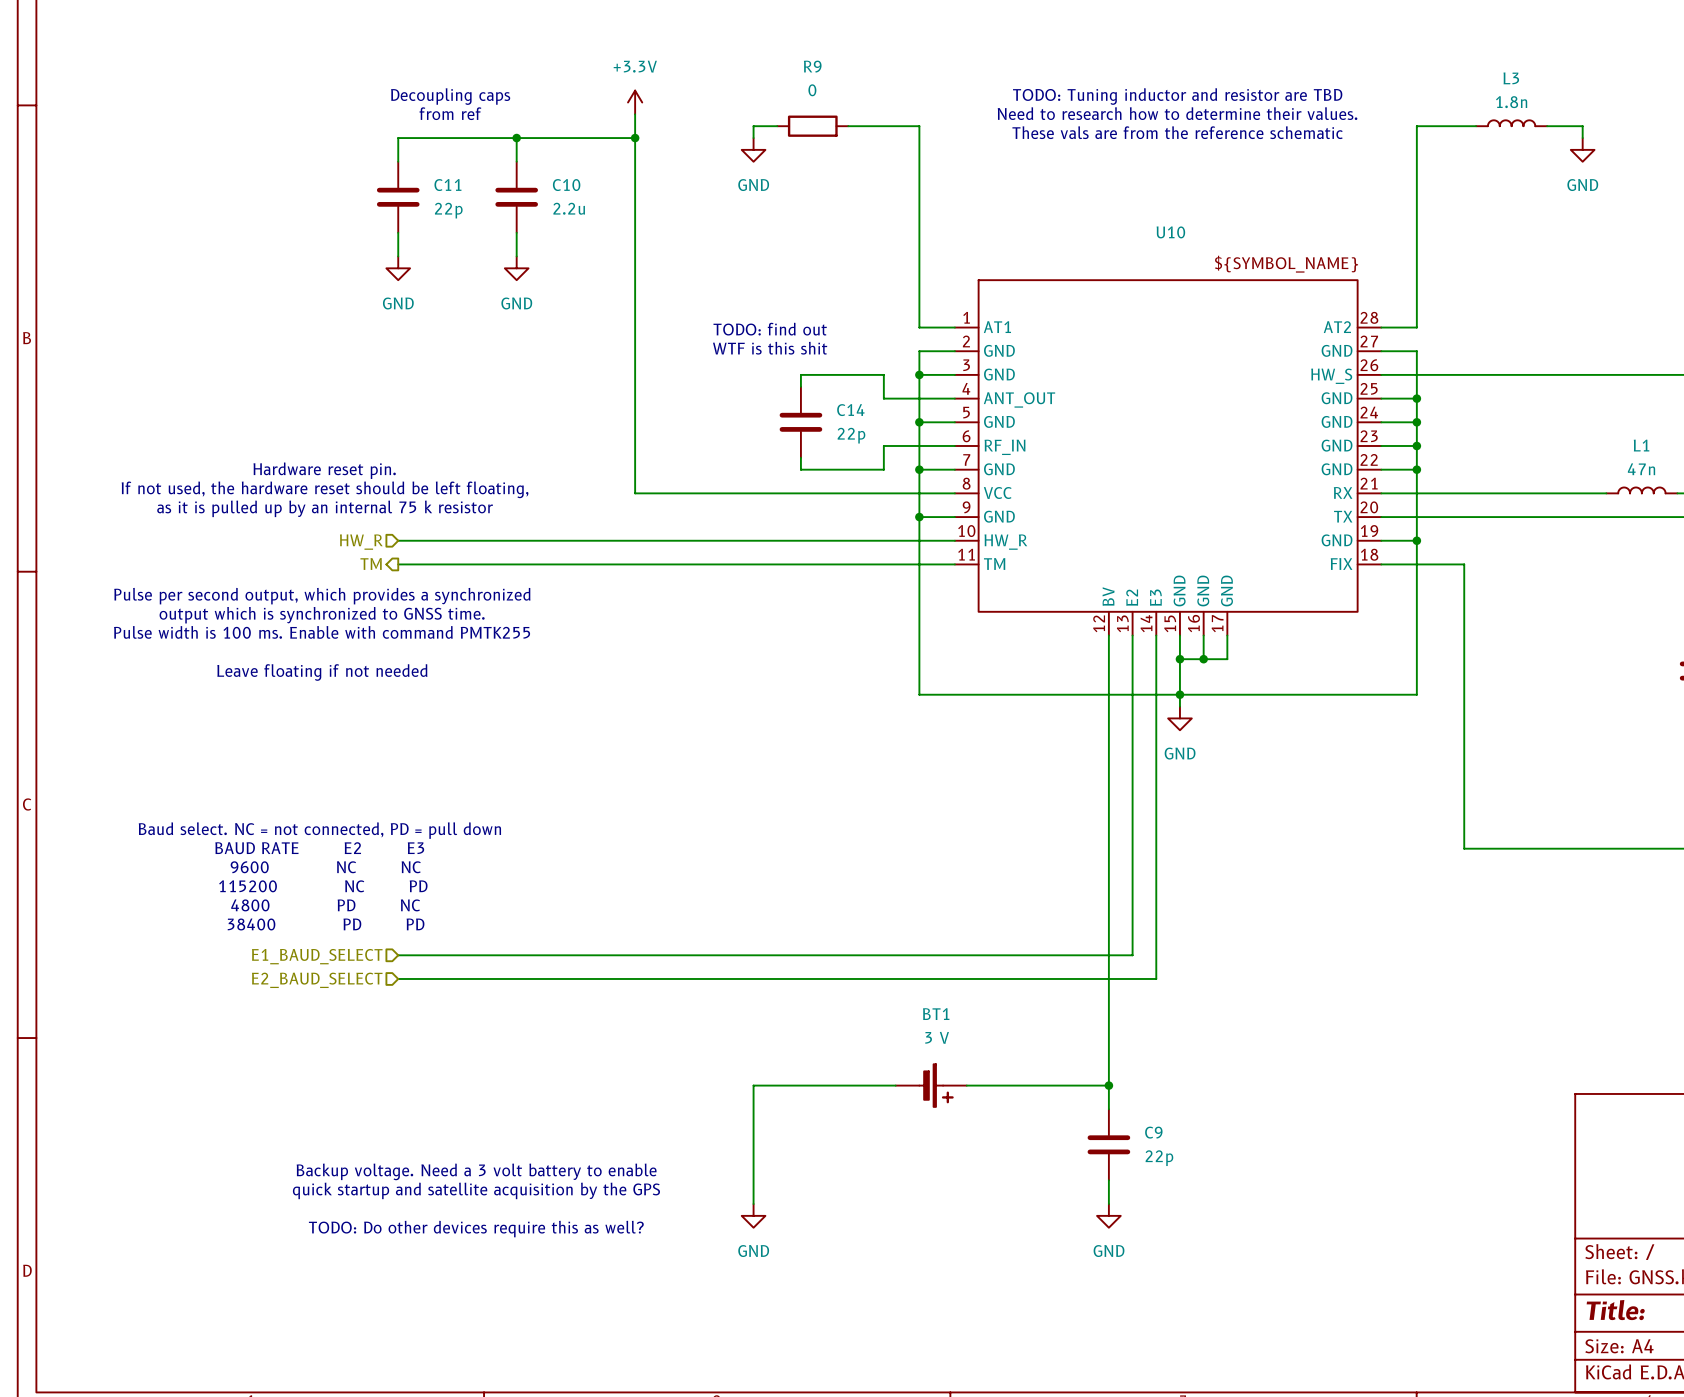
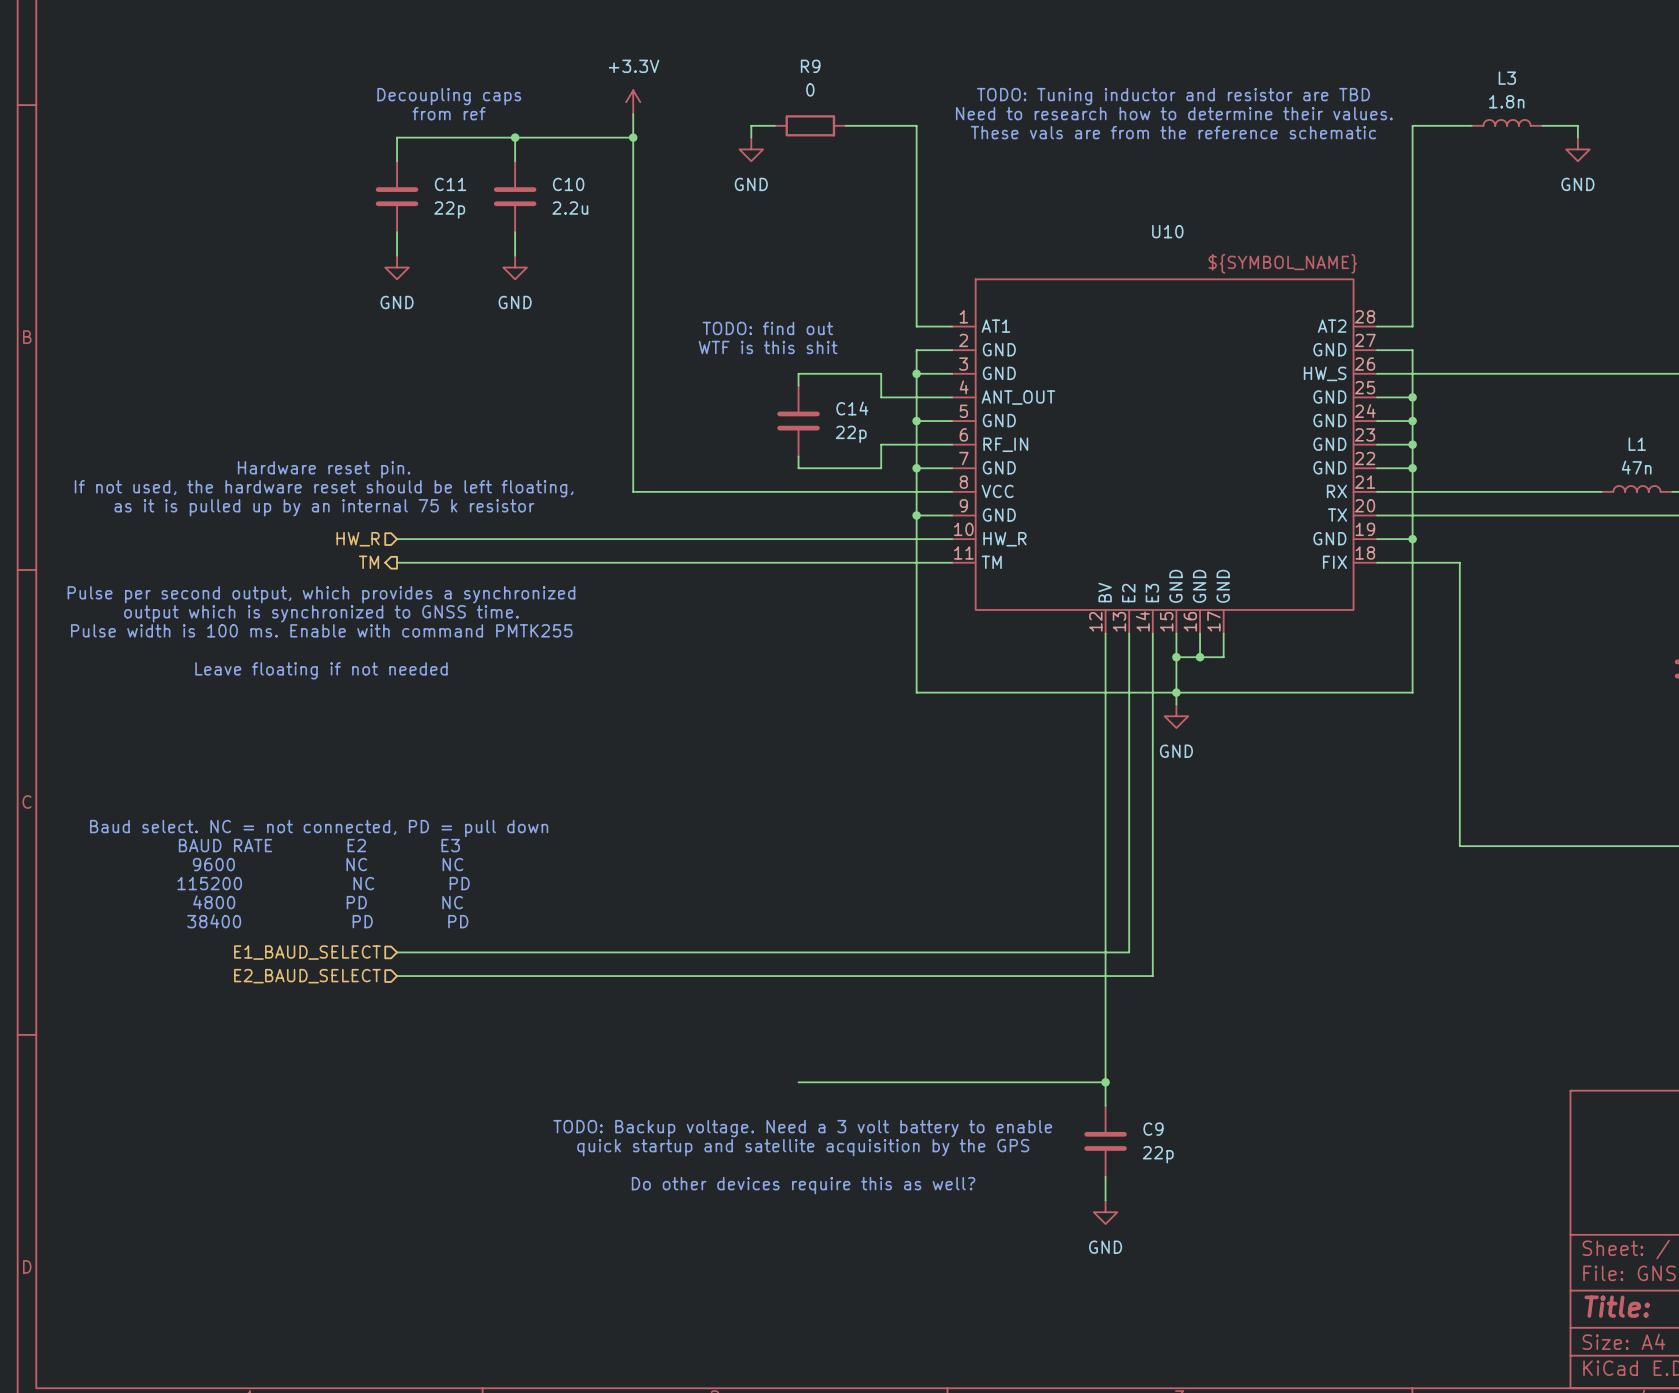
wire: (800, 1085) (753, 1085) (753, 1204) -> none
BT1: 3 V (931, 1085) -> none
text: none -> TODO: Backup voltage. Need a 3 volt battery to enable (802, 1128)
text: none -> quick startup and satellite acquisition by the GPS (803, 1147)
text: Backup voltage. Need a 3 volt battery to enable (476, 1171) -> none
text: none -> Do other devices require this as well? (803, 1185)
text: quick startup and satellite acquisition by the GPS (476, 1190) -> none
power symbol: GND (753, 1215) -> none
text: TODO: Do other devices require this as well? (476, 1229) -> none

